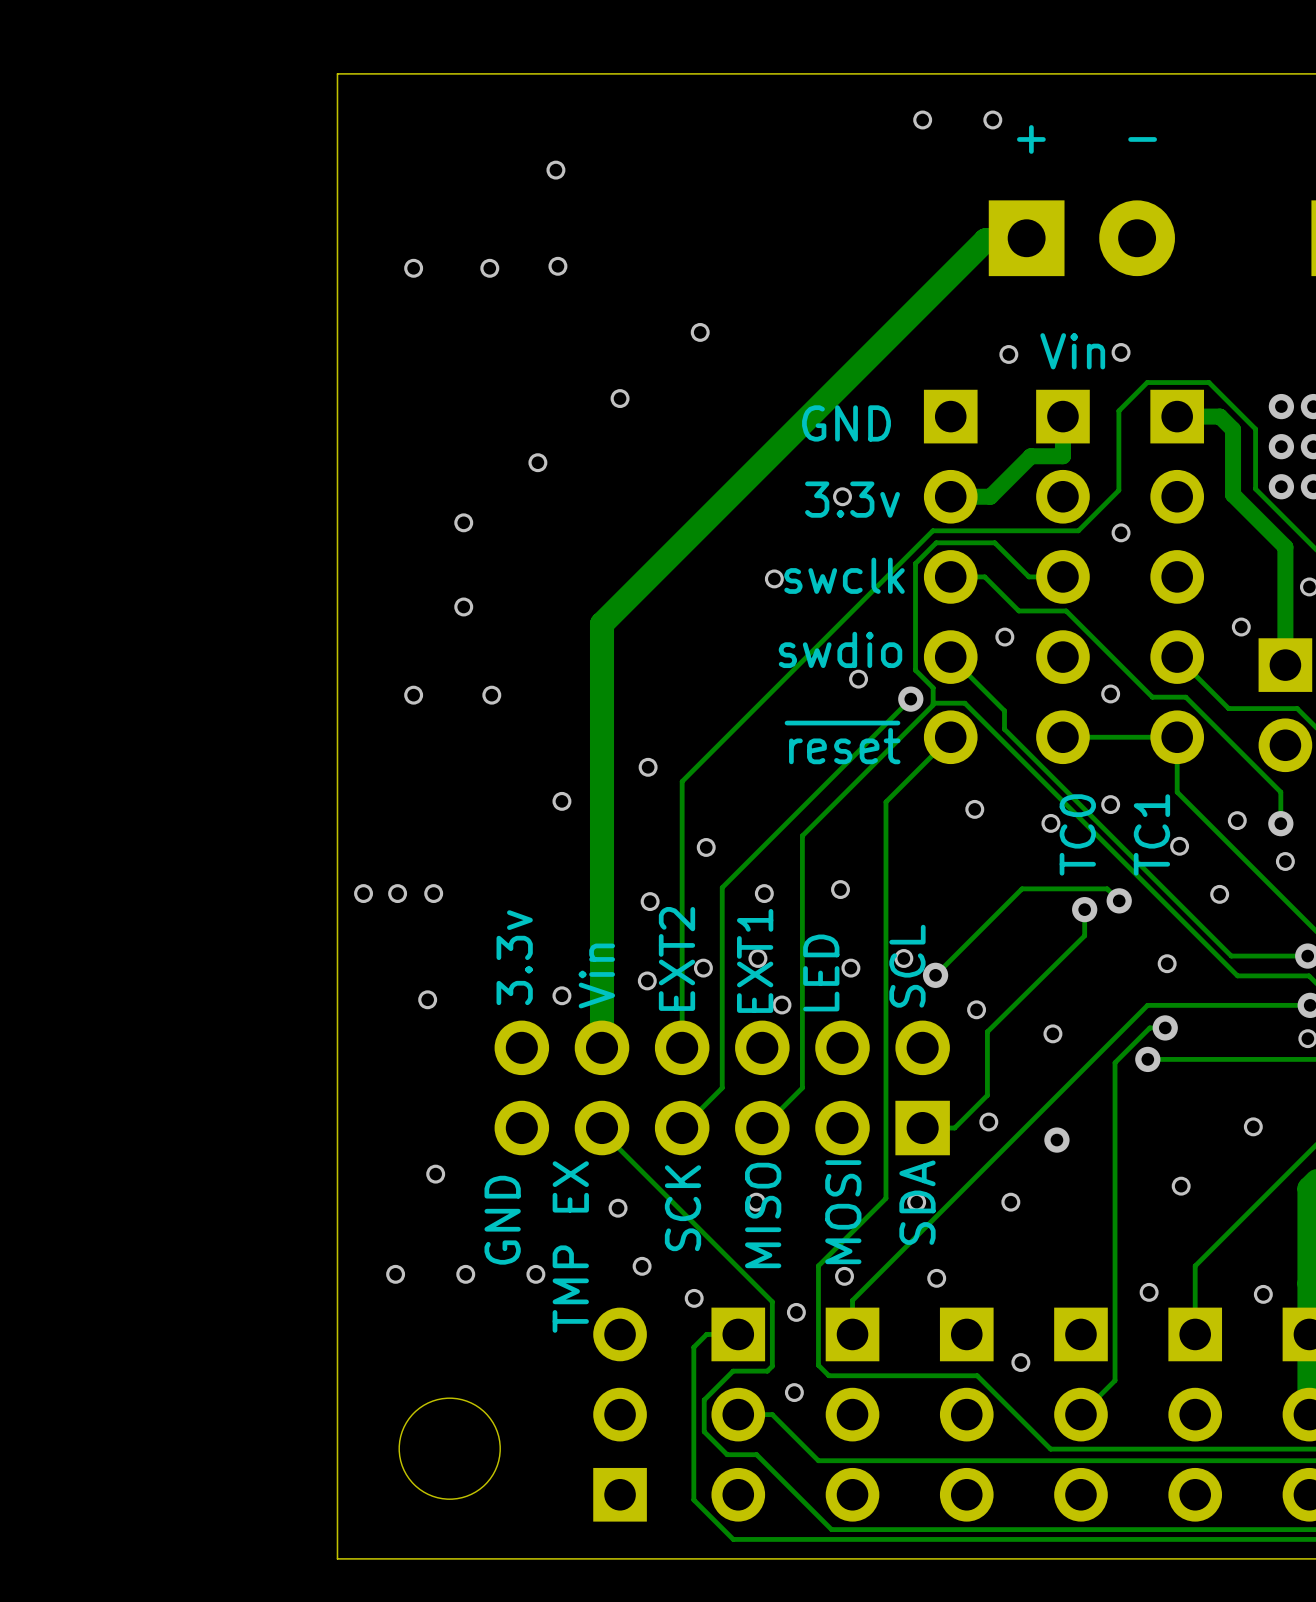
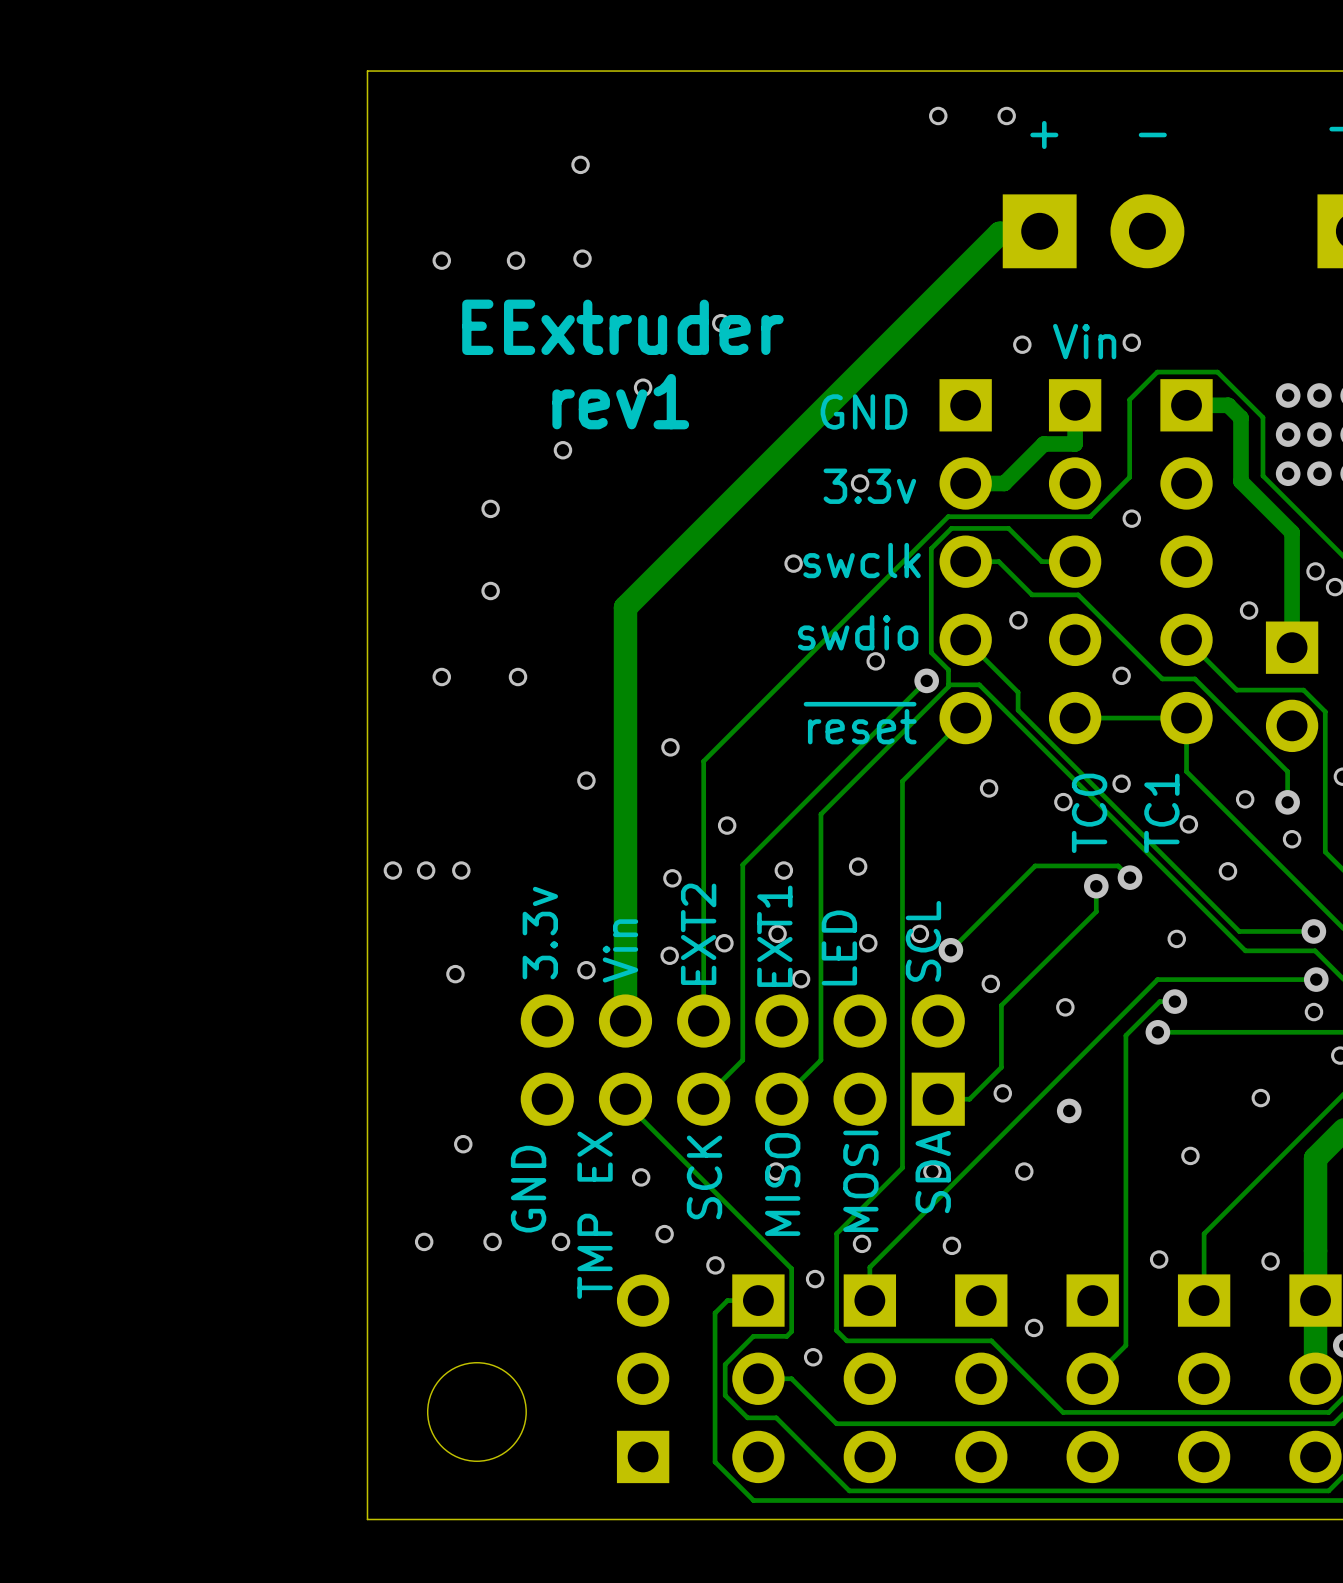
text: none -> EExtruder (622, 327)
text: none -> rev1 (620, 401)

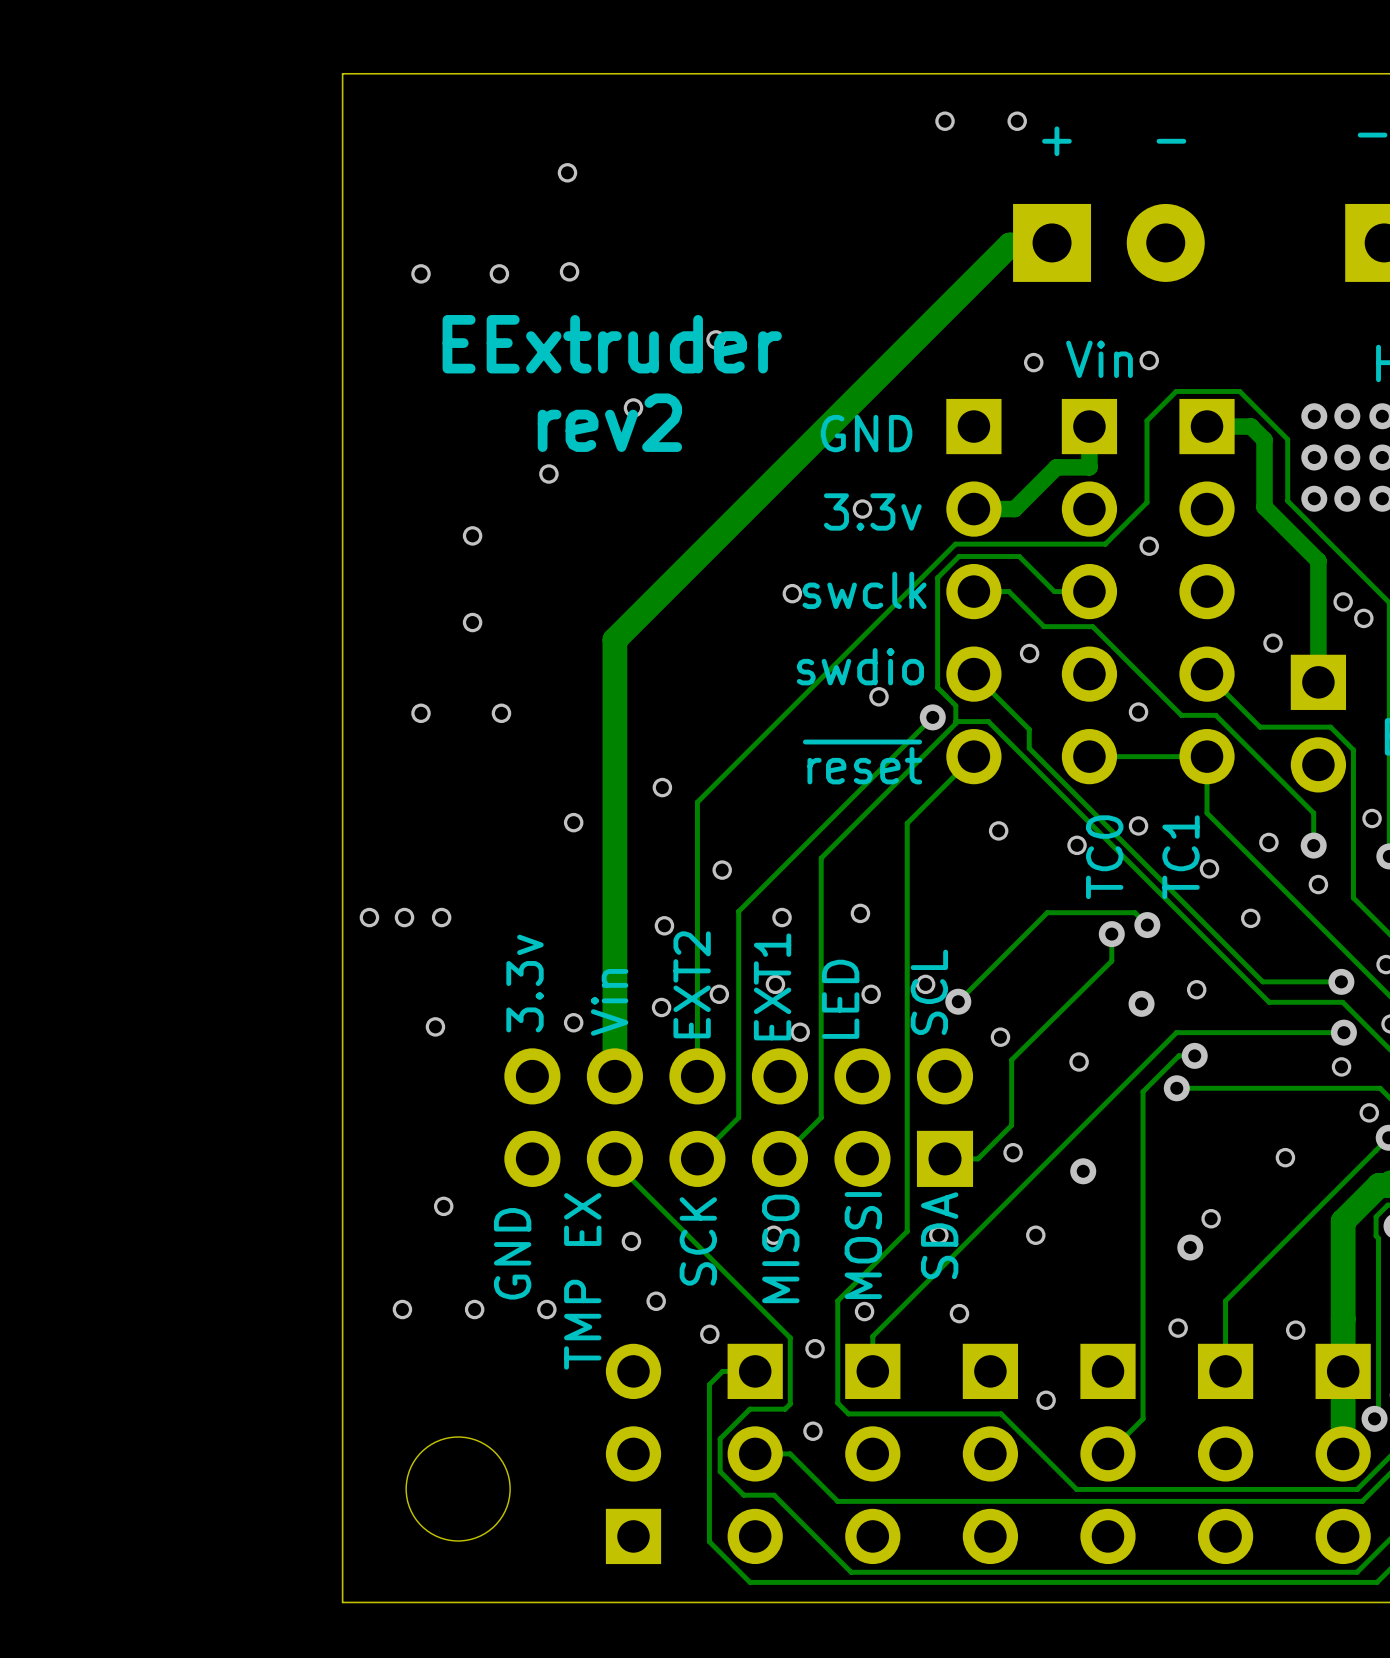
text: rev1 (620, 401) -> rev2 (609, 422)
via: none -> (1141, 1003)
via: none -> (1190, 1247)

